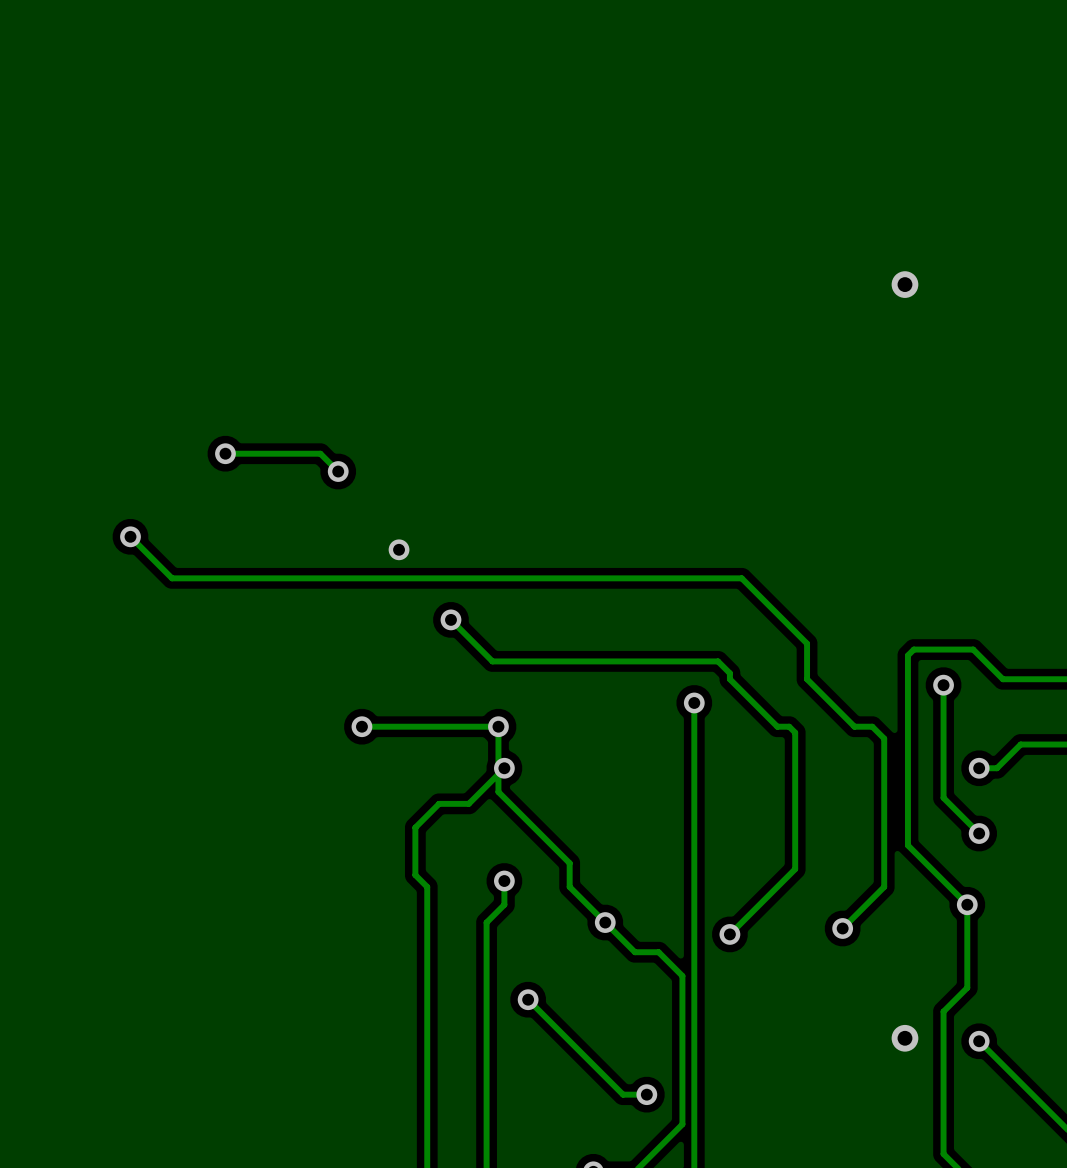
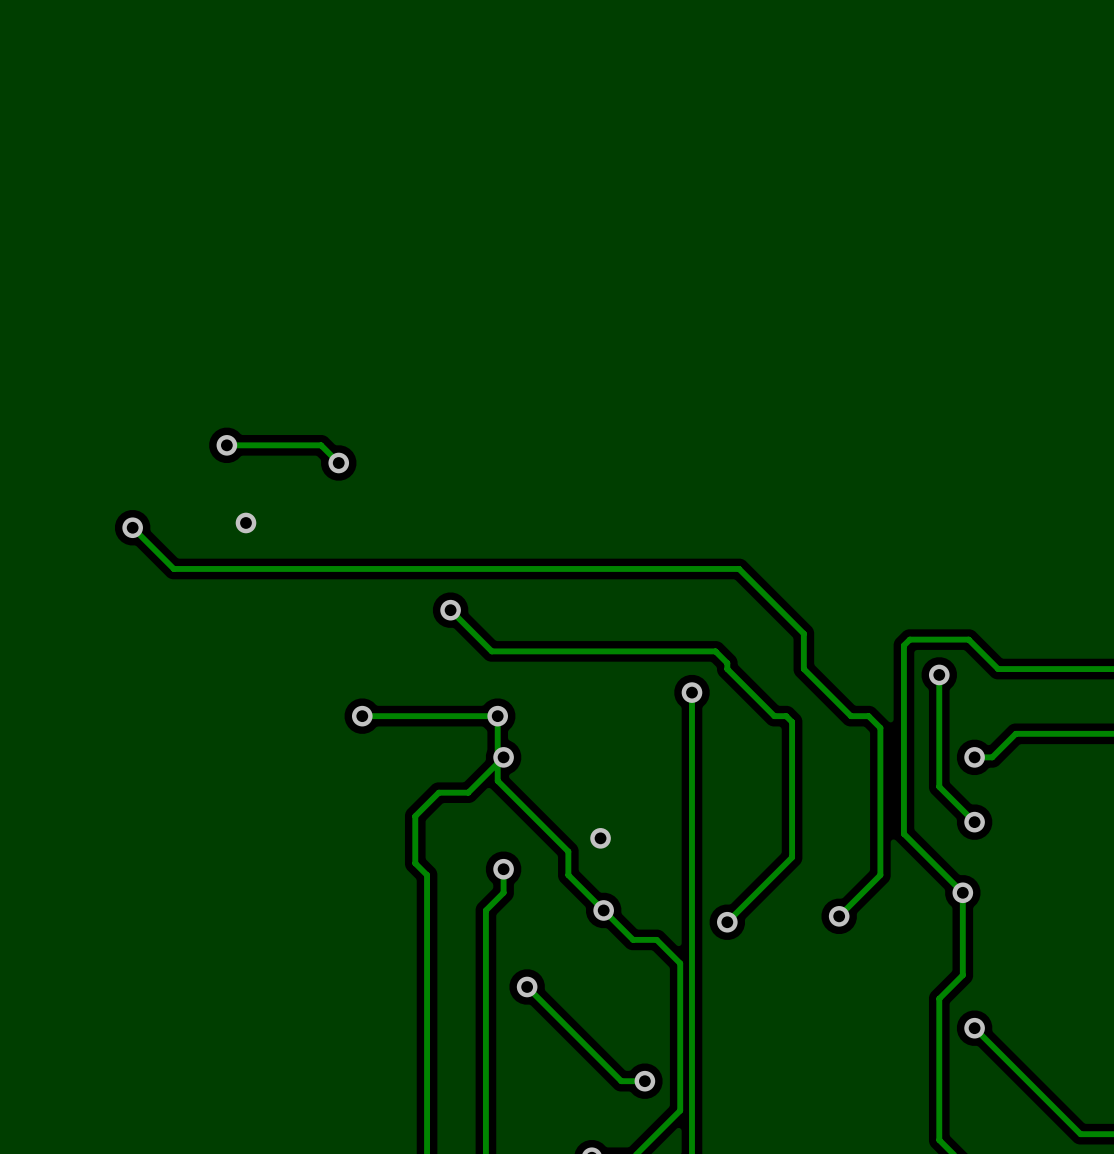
via: (904, 284) -> none
via position: (399, 549) -> (245, 522)
via: none -> (600, 838)
via: (904, 1038) -> none

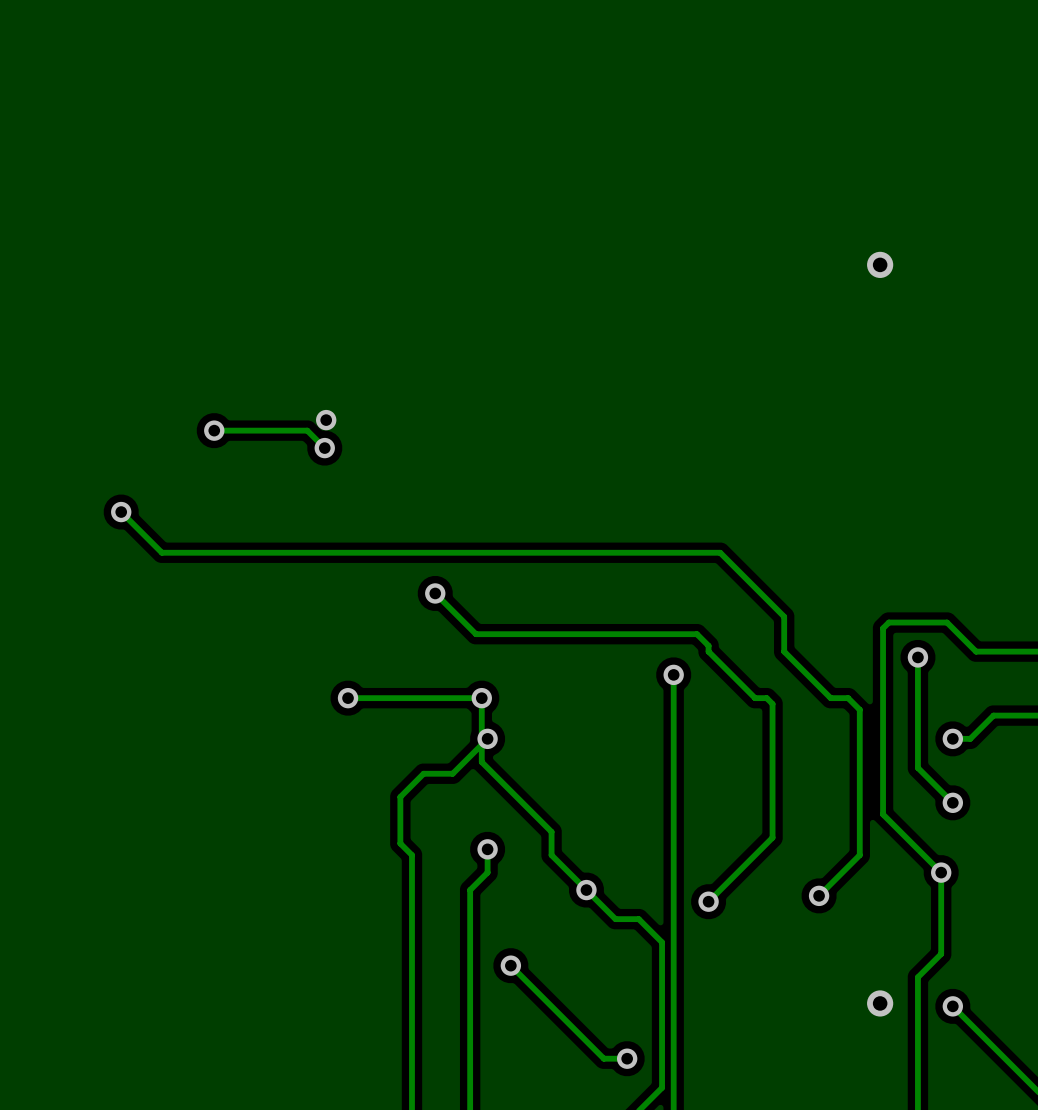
via: none -> (880, 264)
via position: (245, 522) -> (326, 420)
via: (600, 838) -> none
via: none -> (880, 1003)

